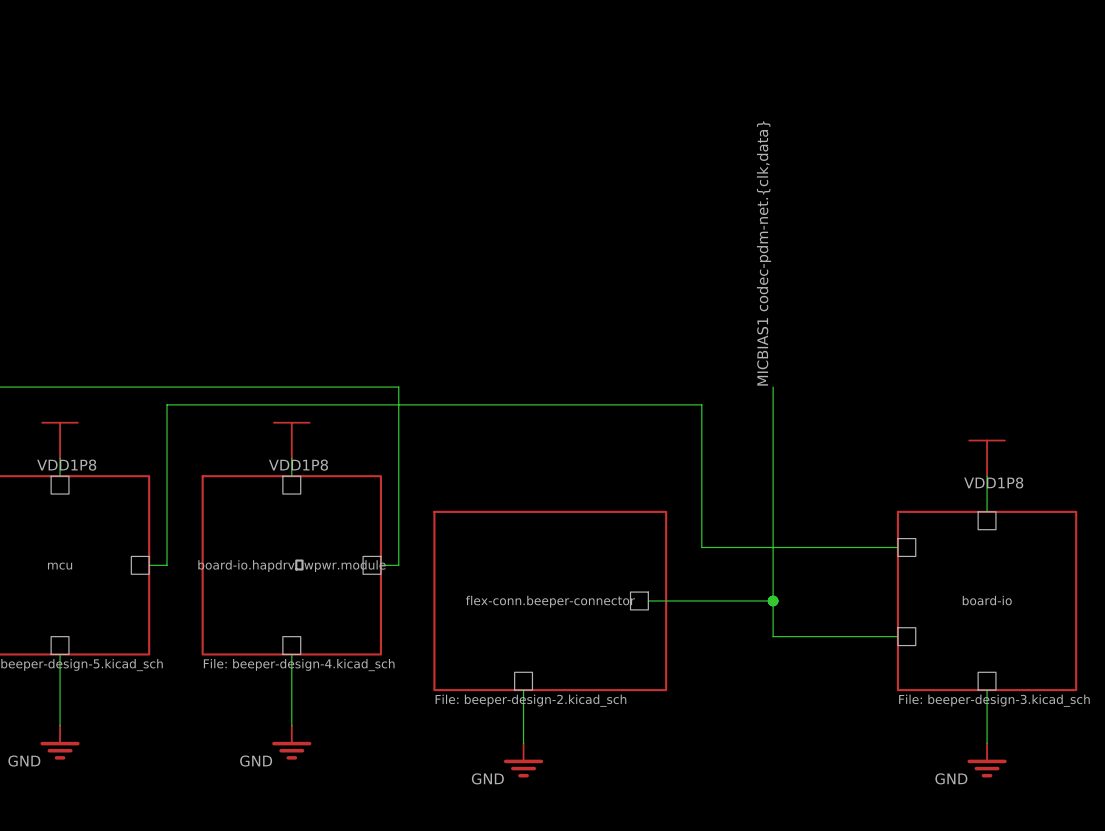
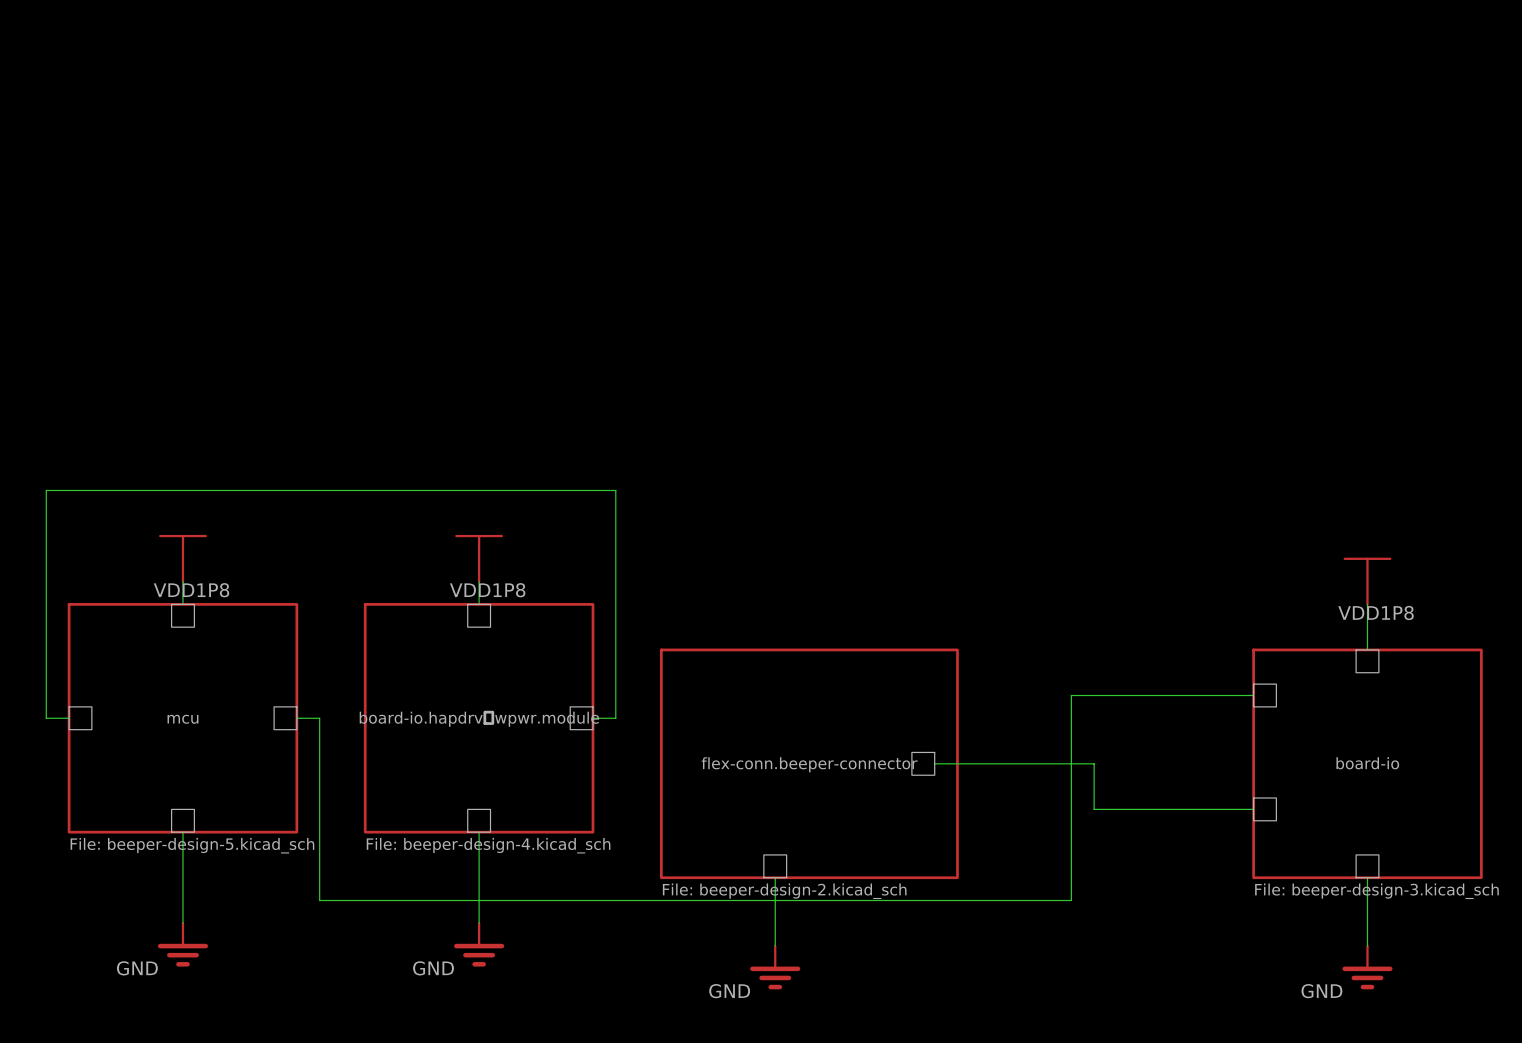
label: MICBIAS1 codec-pdm-net.{clk,data} (764, 253) -> none
wire: (773, 387) (773, 600) -> none
wire: (755, 547) (701, 547) (701, 404) (167, 404) (167, 565) -> (1071, 695) (1071, 900) (319, 900) (319, 718)
junction: (773, 600) -> none

